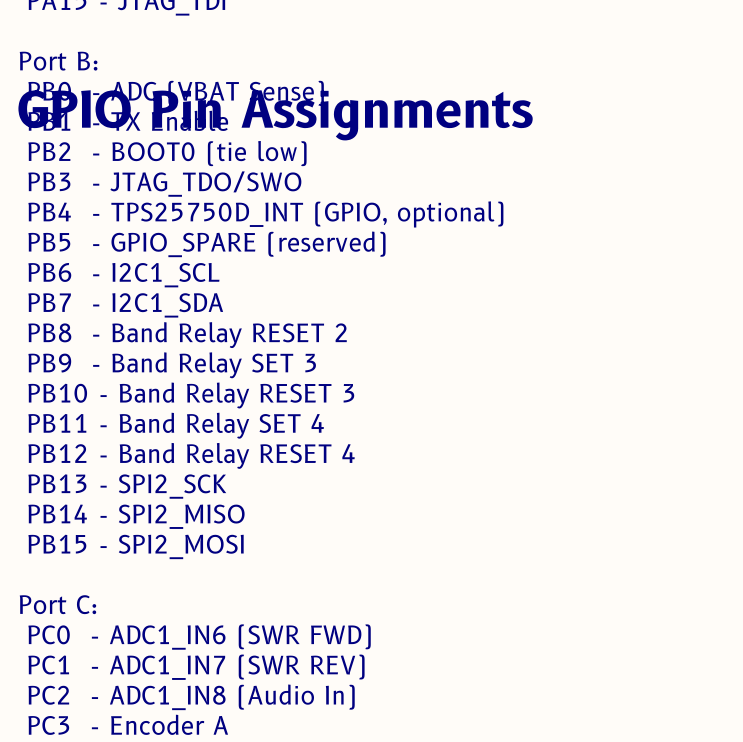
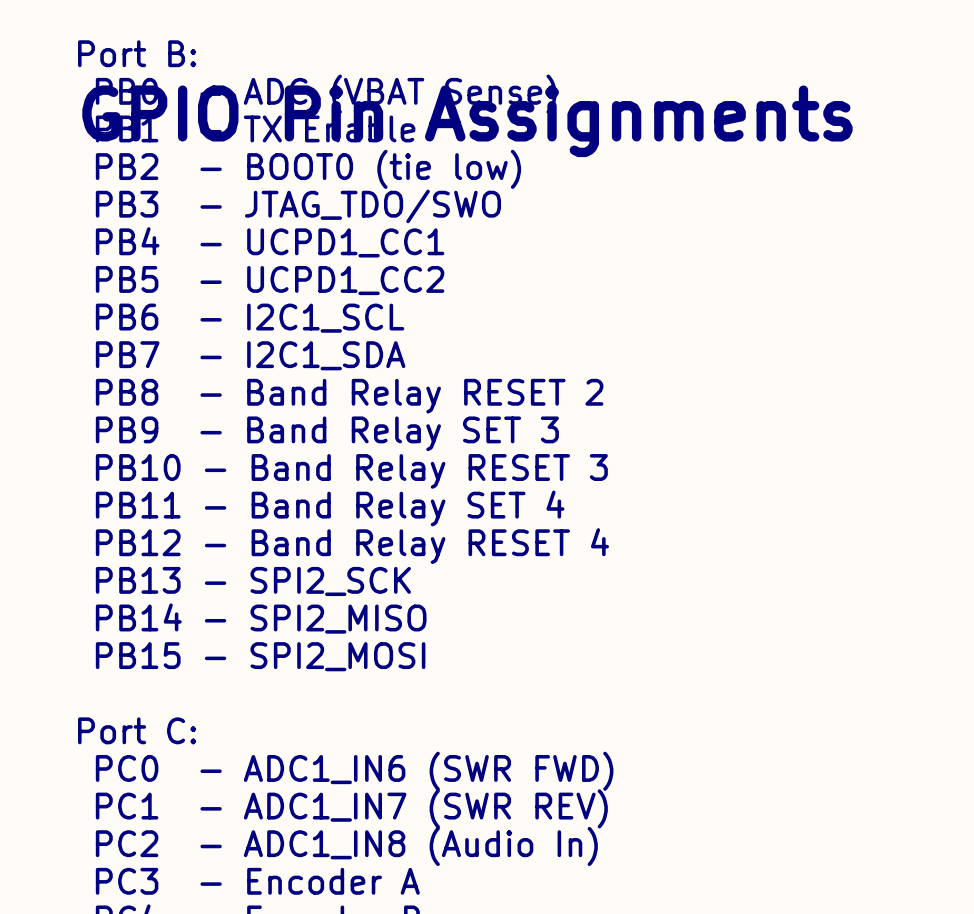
text: PB4 - TPS25750D_INT (GPIO, optional) (265, 214) -> PB4 - UCPD1_CC1 (270, 242)
text: PB5 - GPIO_SPARE (reserved) (206, 244) -> PB5 - UCPD1_CC2 (270, 280)

